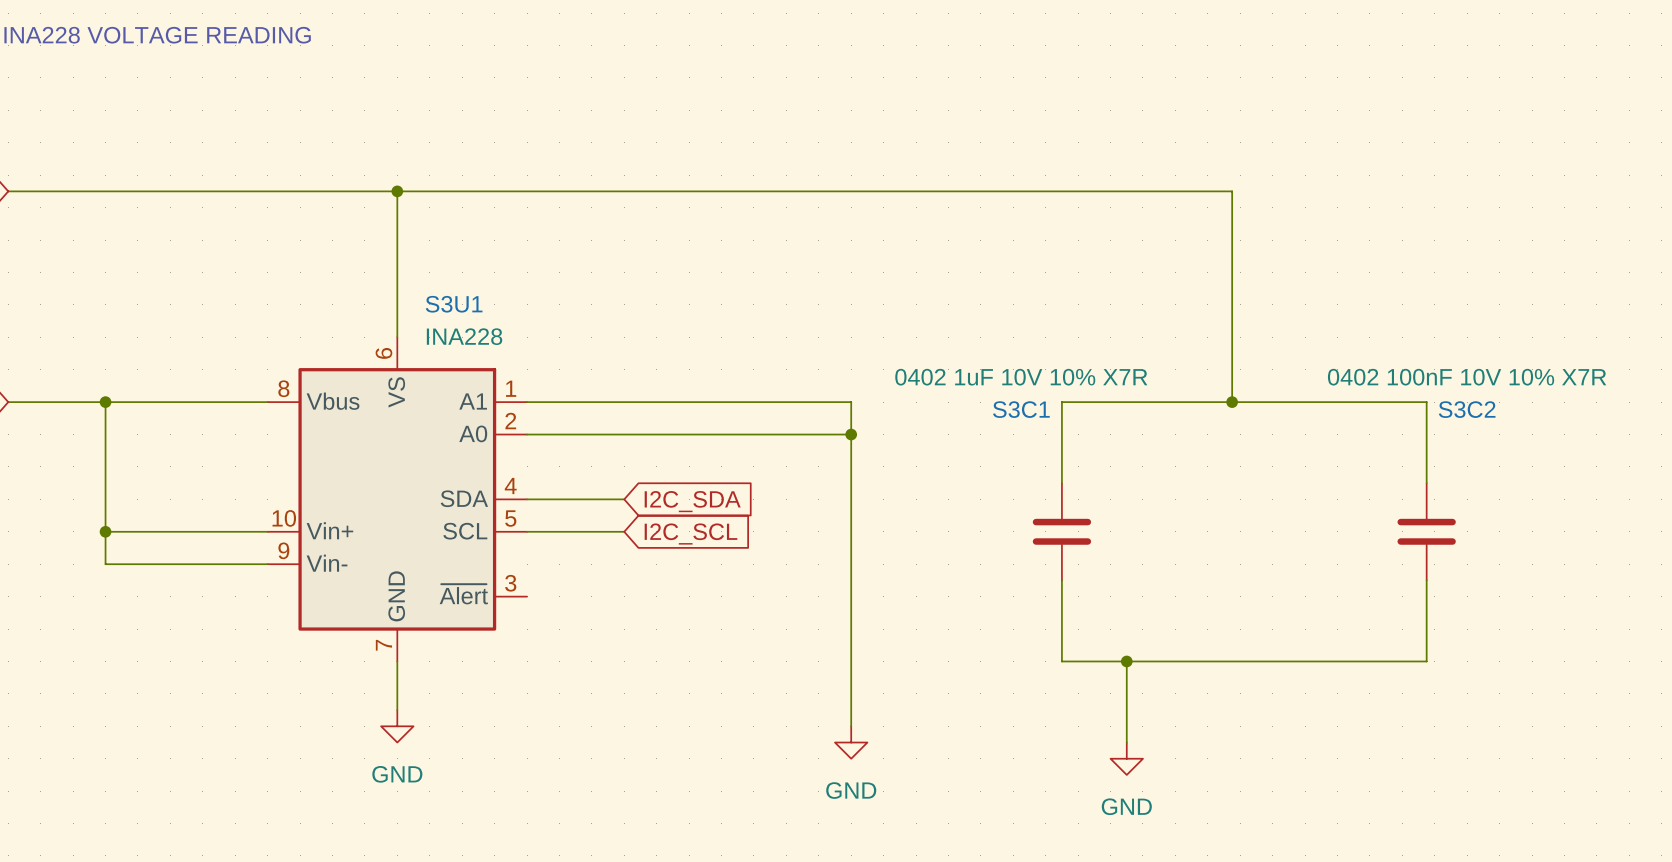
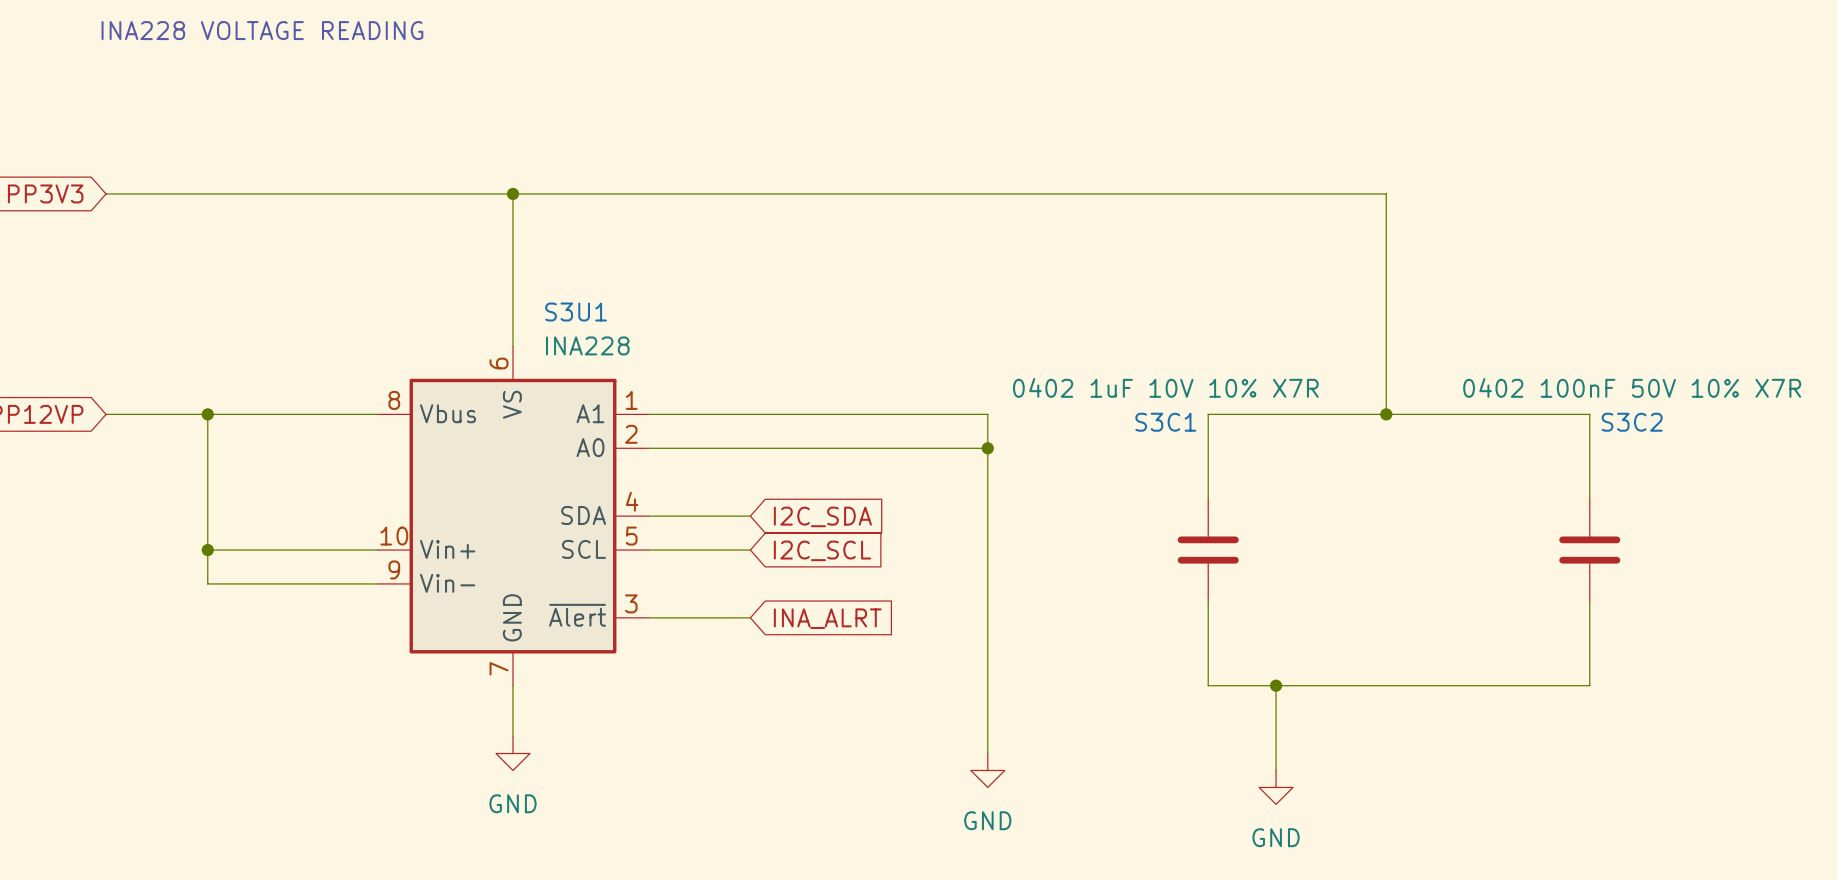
S3C2 value: 0402 100nF 10V 10% X7R (1467, 377) -> 0402 100nF 50V 10% X7R (1632, 387)
wire: none -> (648, 617) (750, 617)
global label: none -> INA_ALRT (827, 618)

